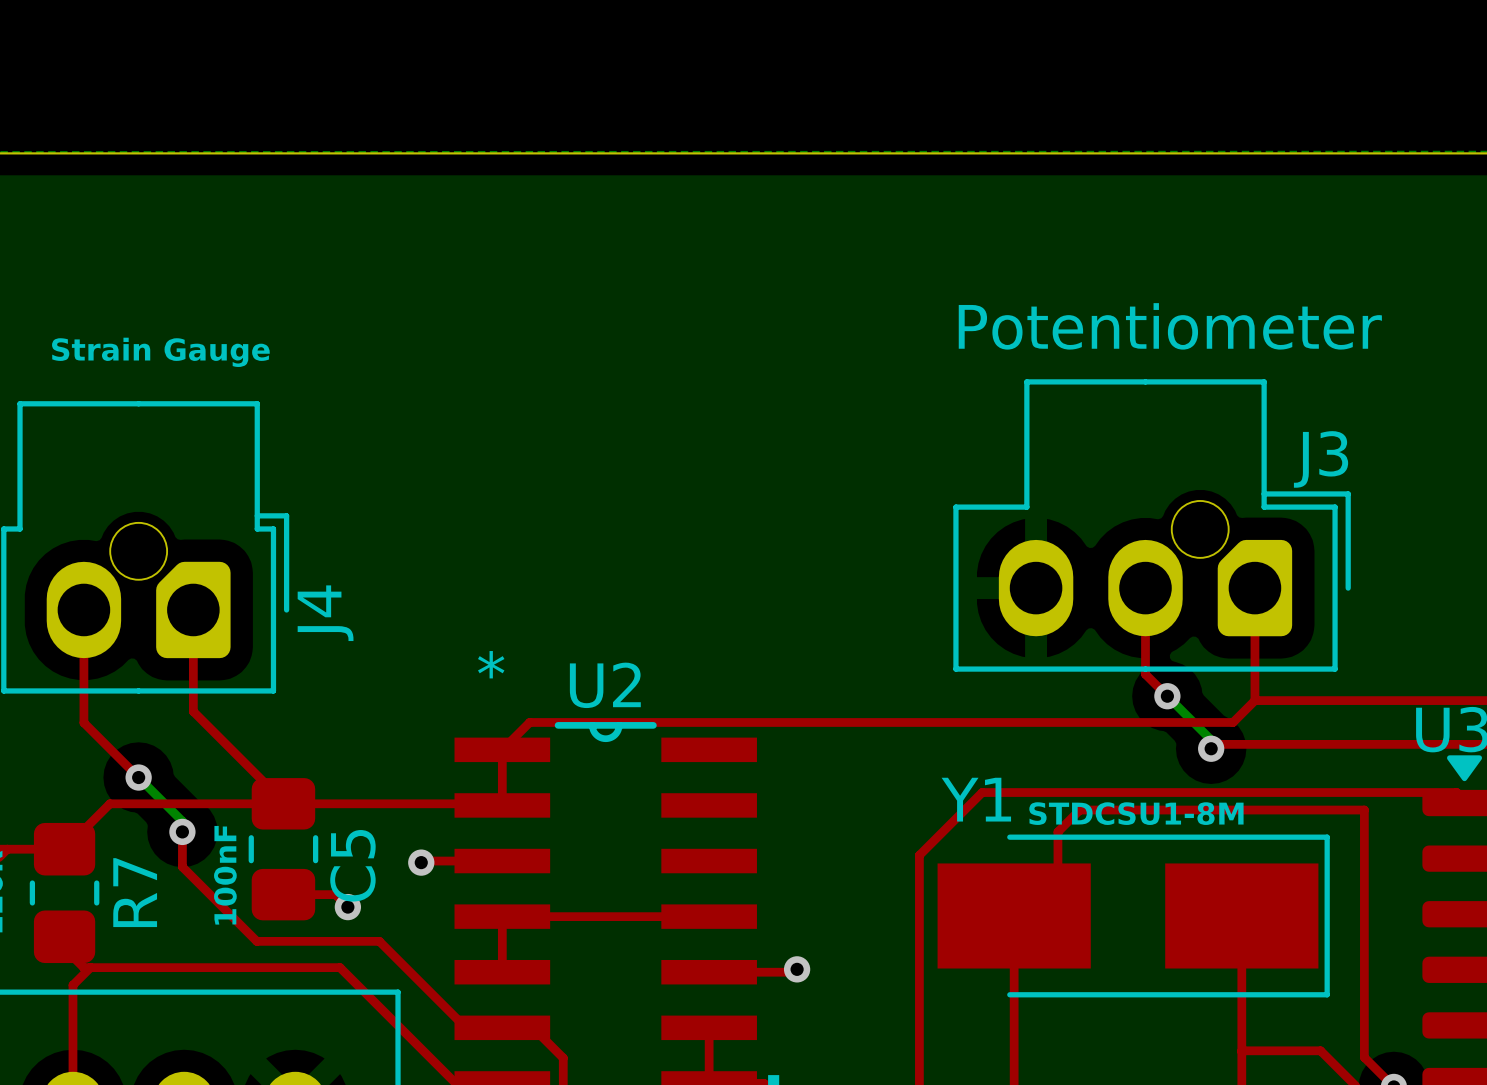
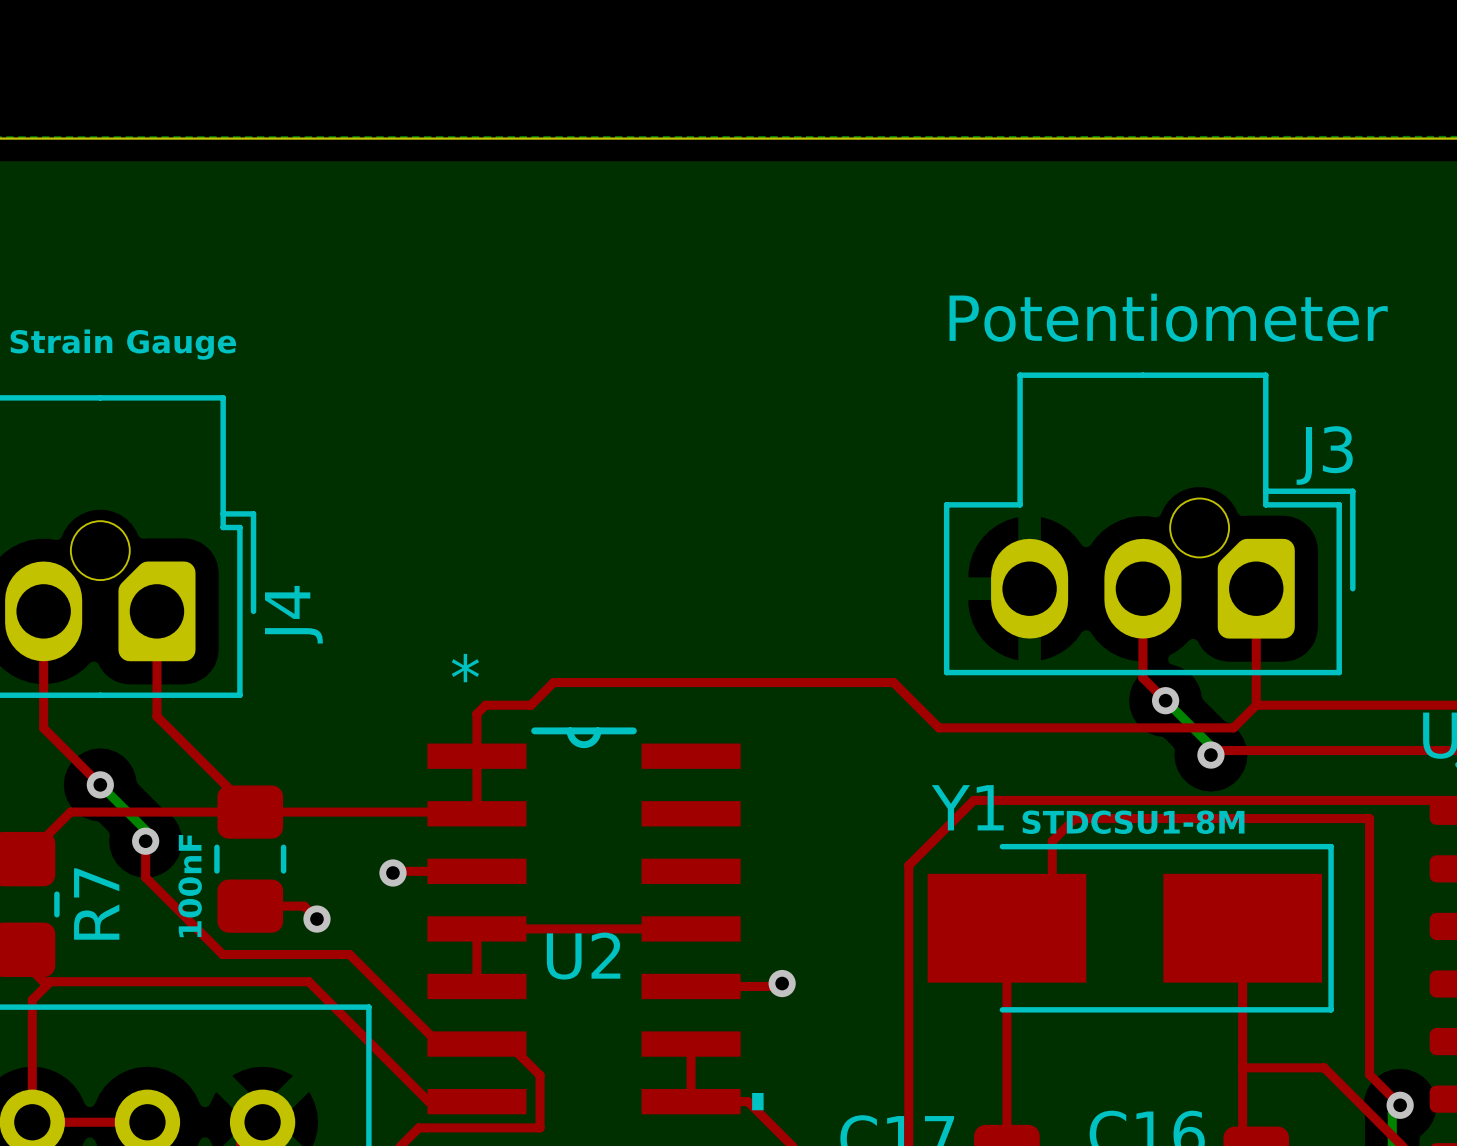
U2 name position: U2 (605, 685) -> U2 (583, 956)
top track: (948, 722) (529, 722) (502, 749) -> (938, 727) (893, 682) (553, 682) (530, 705) (485, 705) (476, 713) (476, 756)
text: C5 (352, 865) -> none

